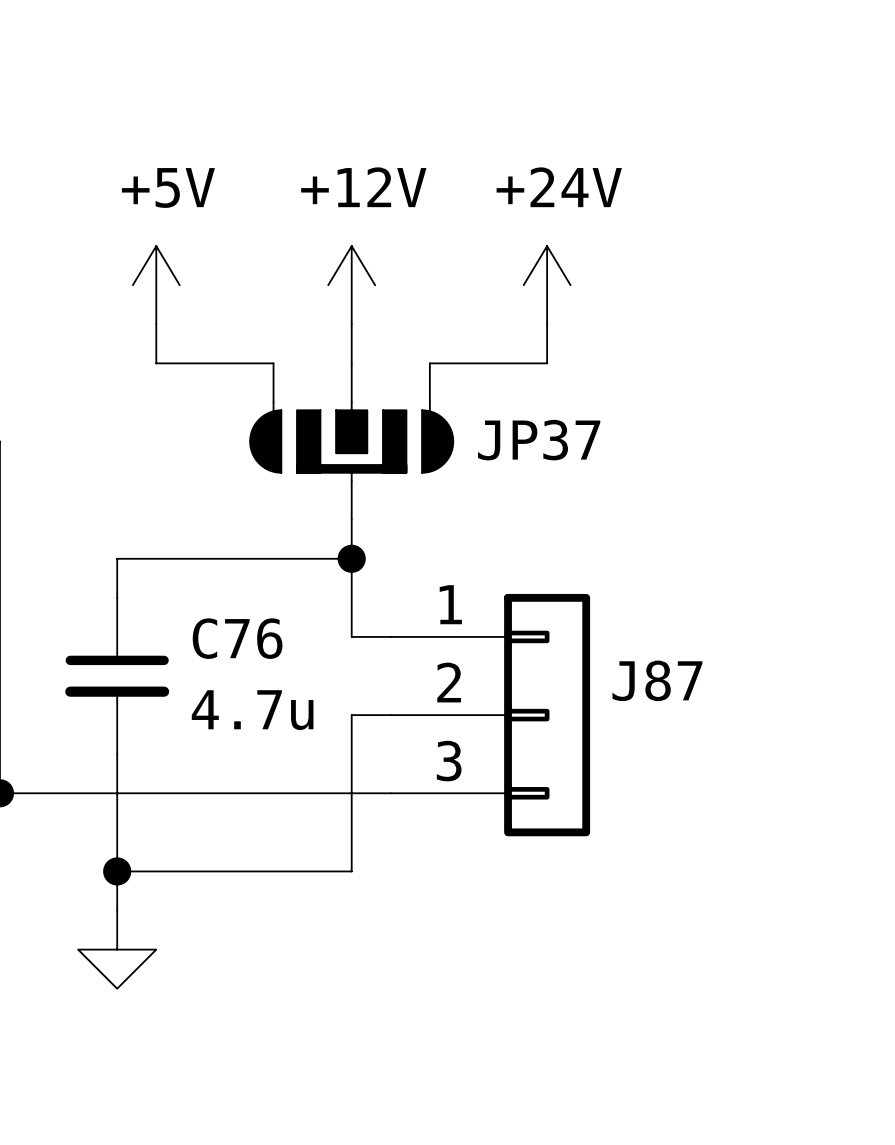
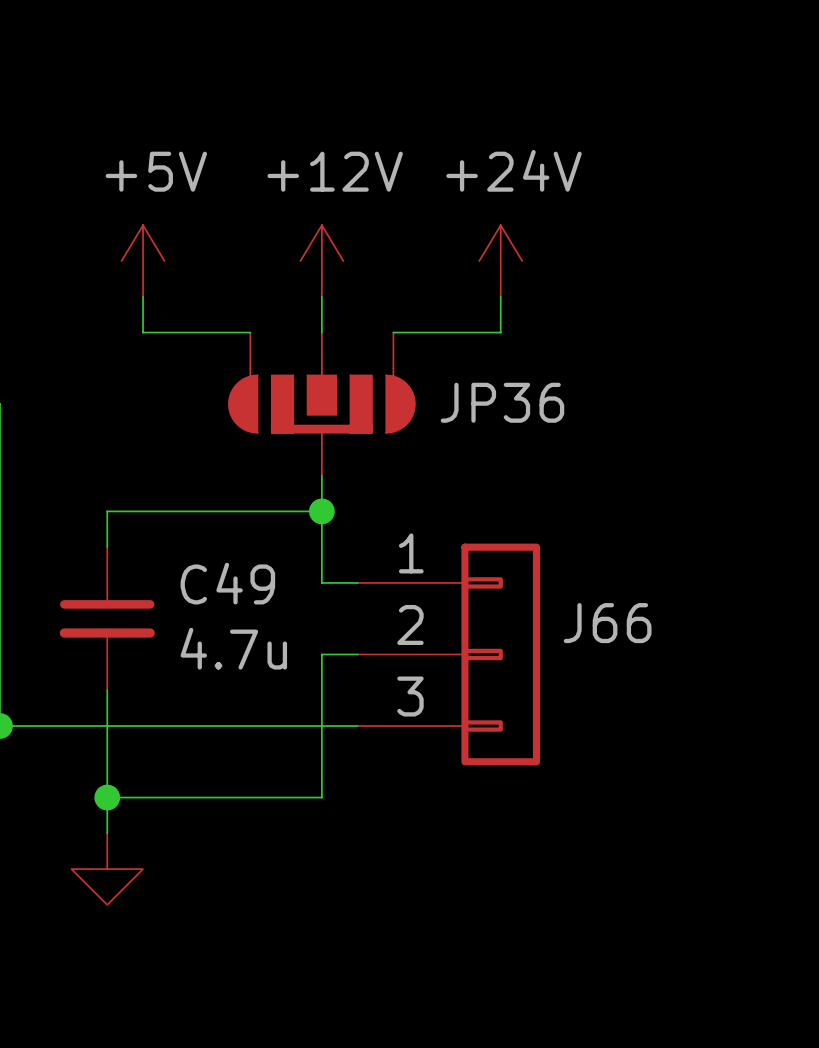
JP37 name: JP37 (539, 440) -> JP36 (502, 402)
C76 name: C76 (237, 638) -> C49 (227, 583)
J87 name: J87 (657, 680) -> J66 (607, 623)

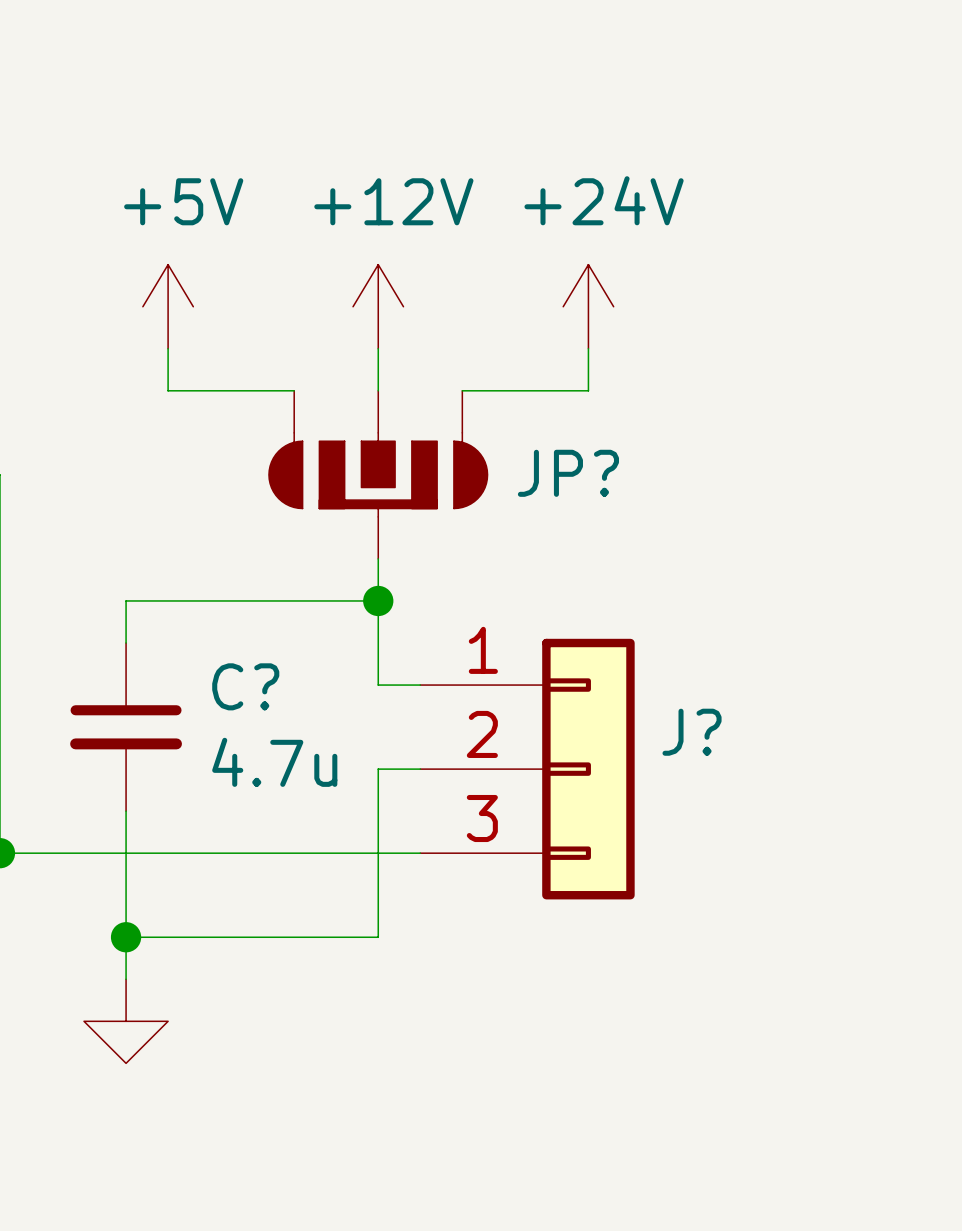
JP36 name: JP36 (502, 402) -> JP? (568, 473)
C49 name: C49 (227, 583) -> C? (245, 686)
J66 name: J66 (607, 623) -> J? (692, 732)

